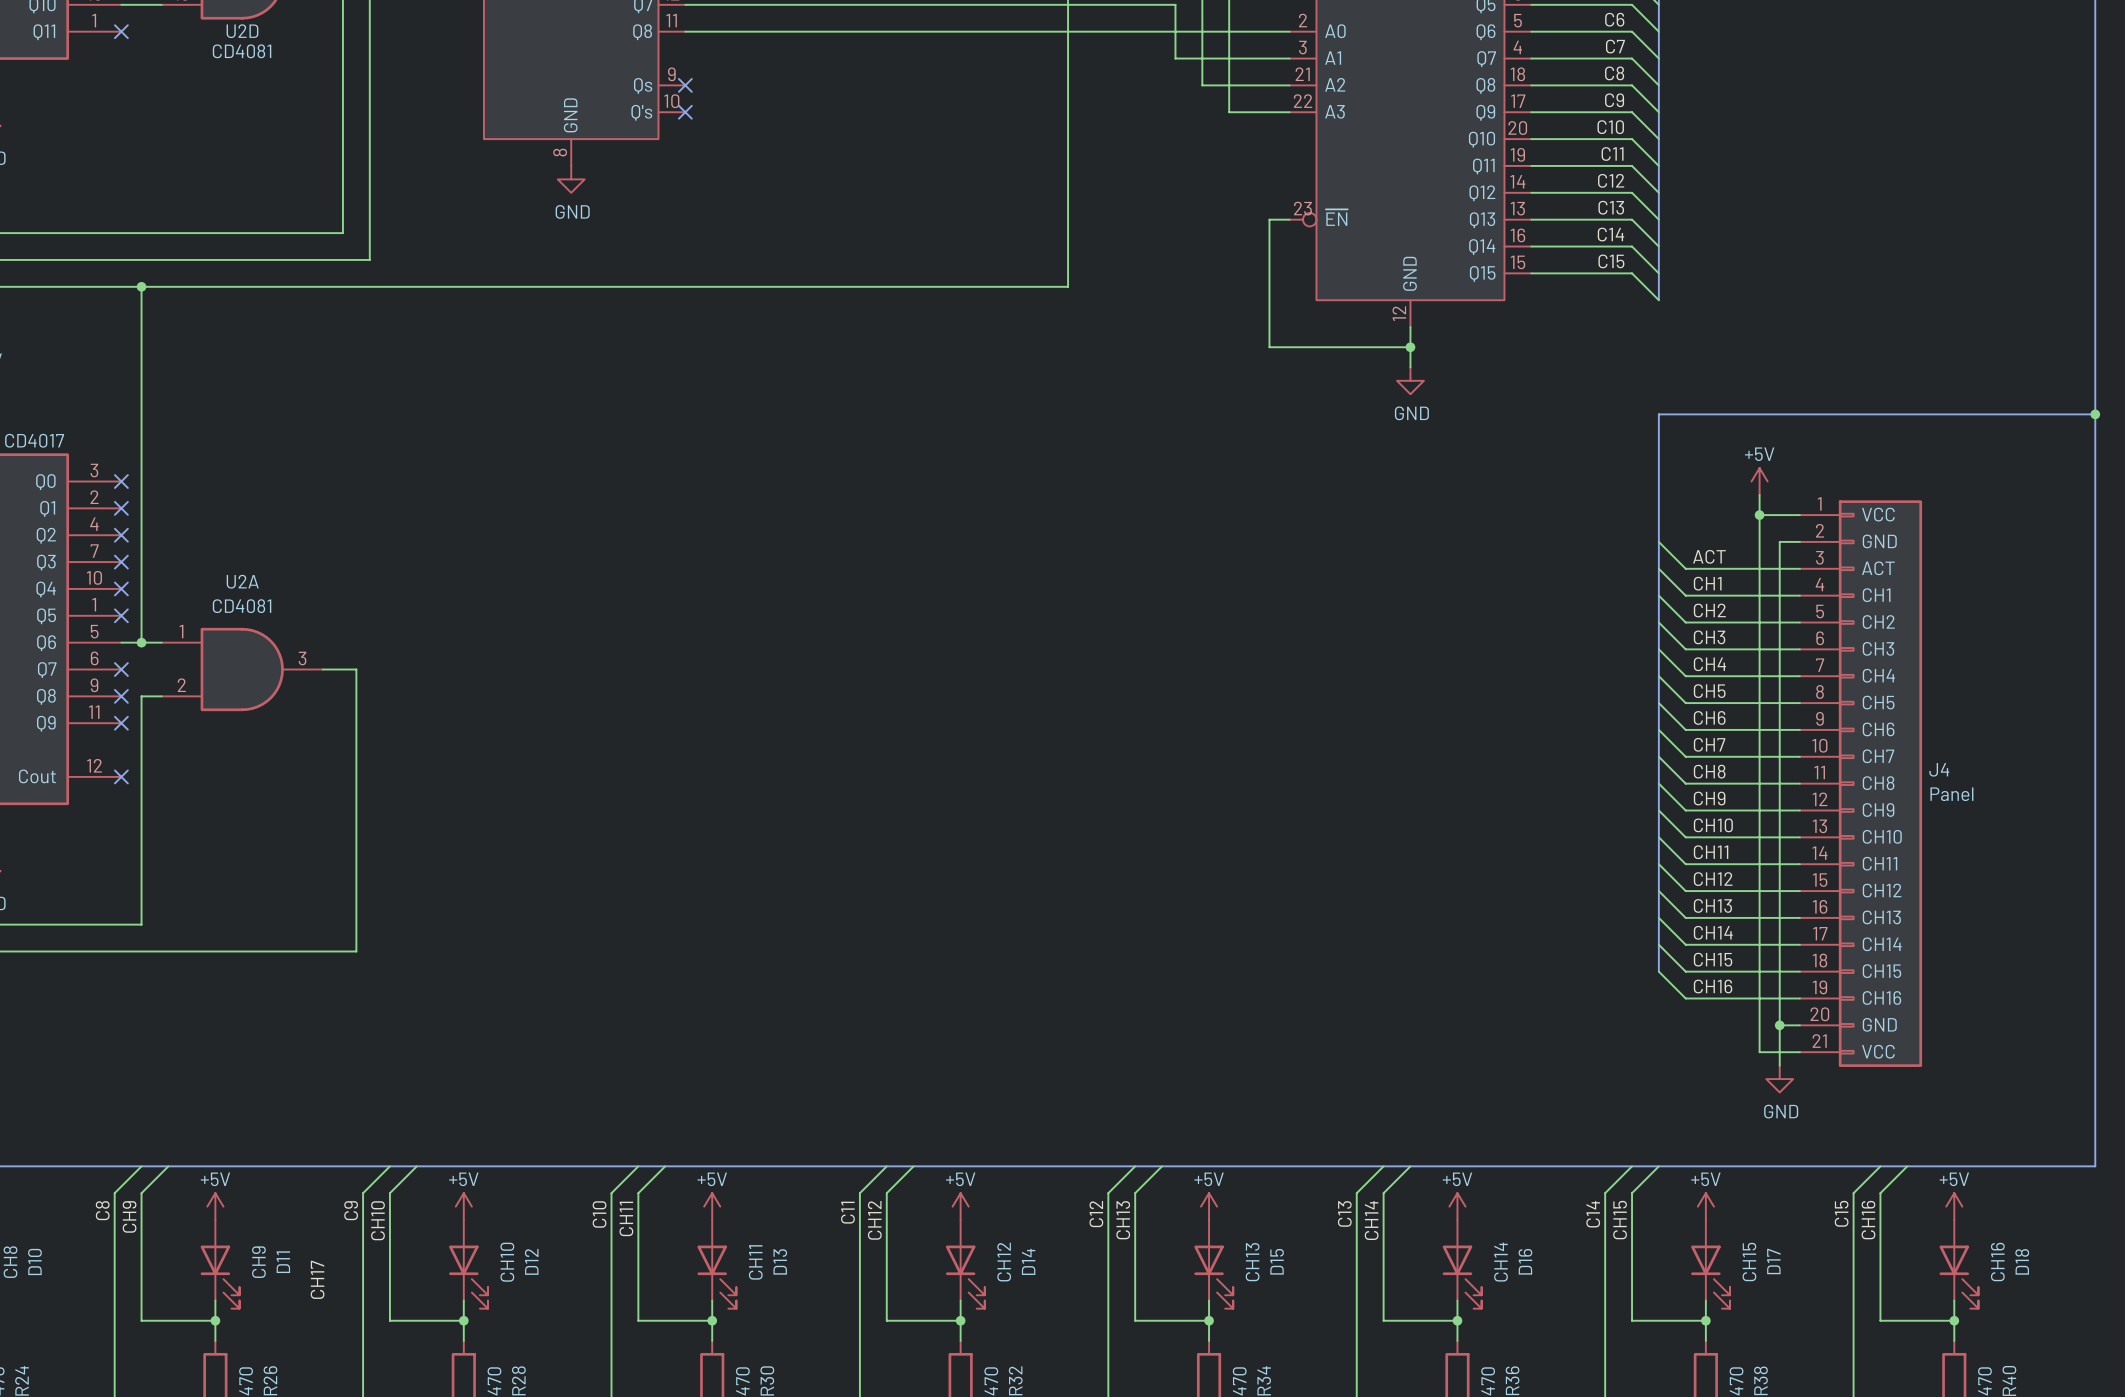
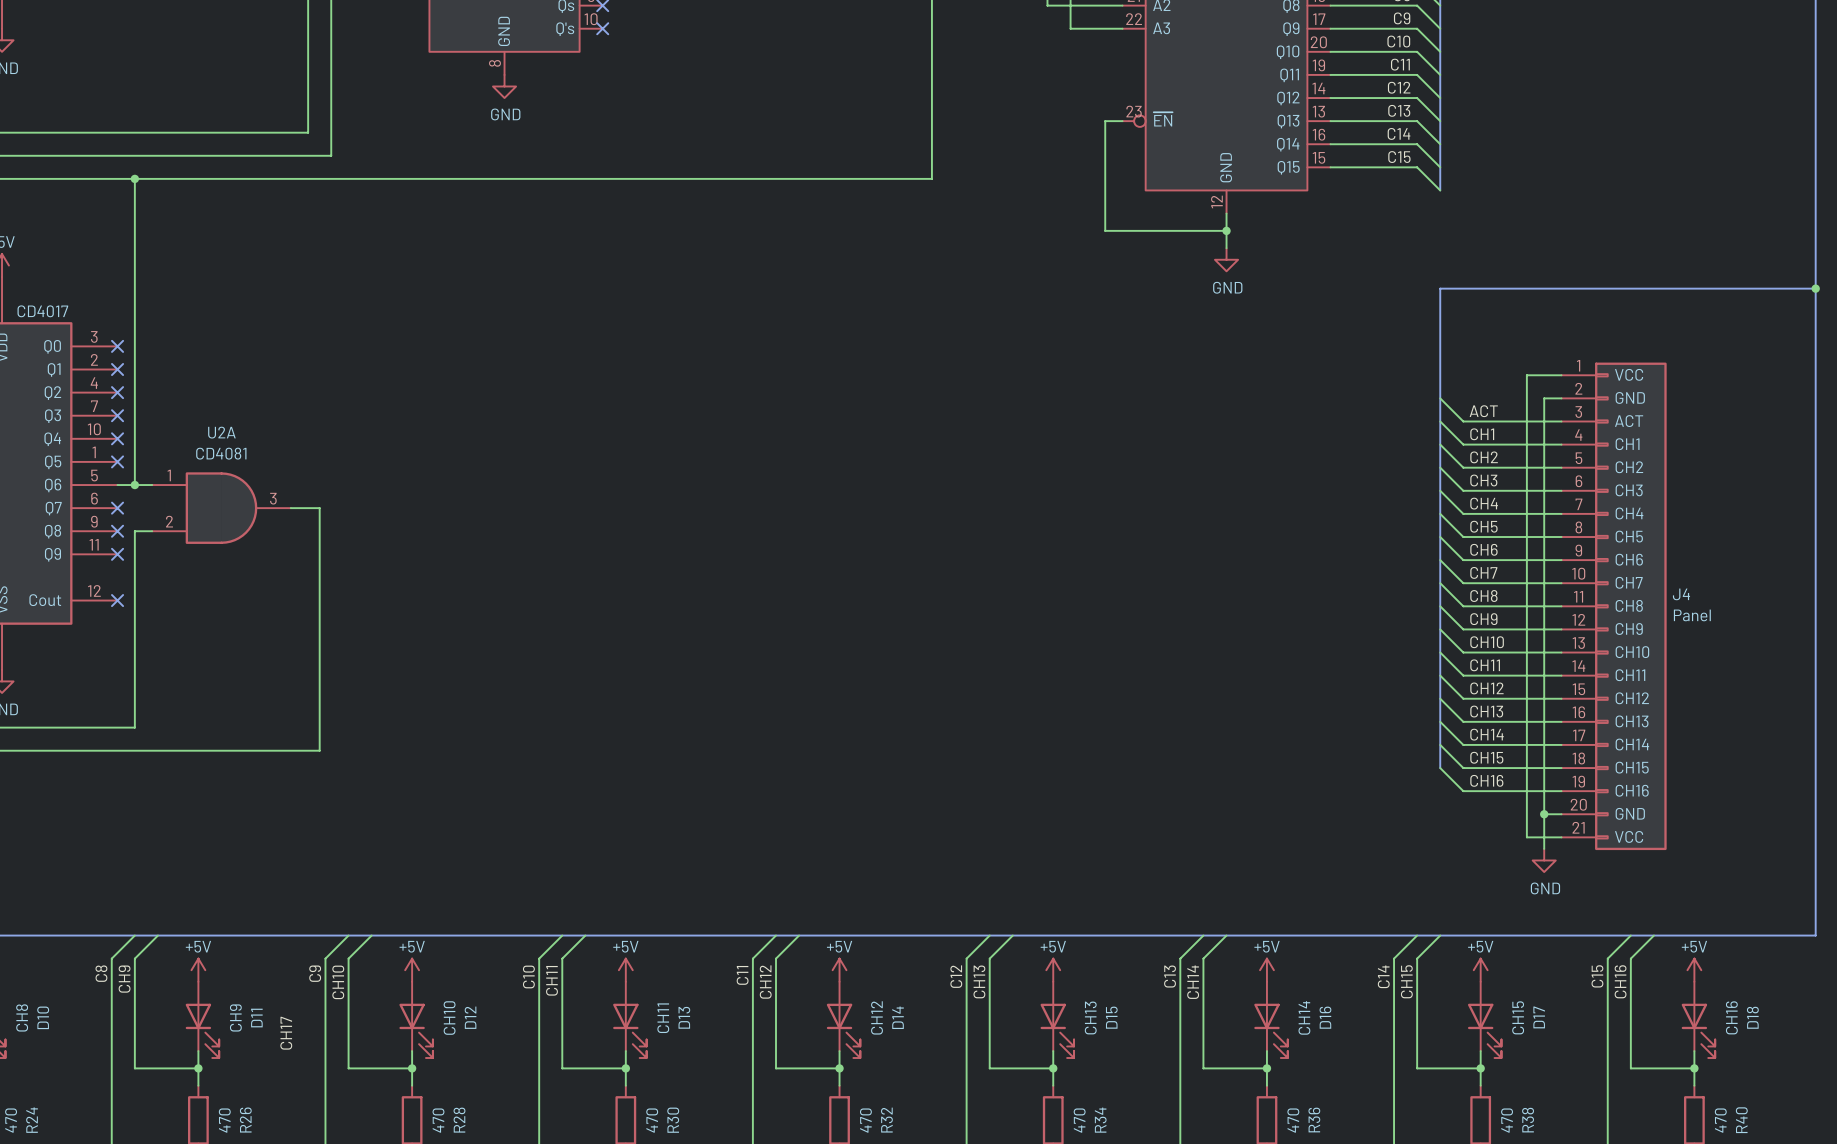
power symbol: +5V (1759, 481) -> none
wire: (1759, 494) (1759, 515) -> none
junction: (1759, 515) -> none

